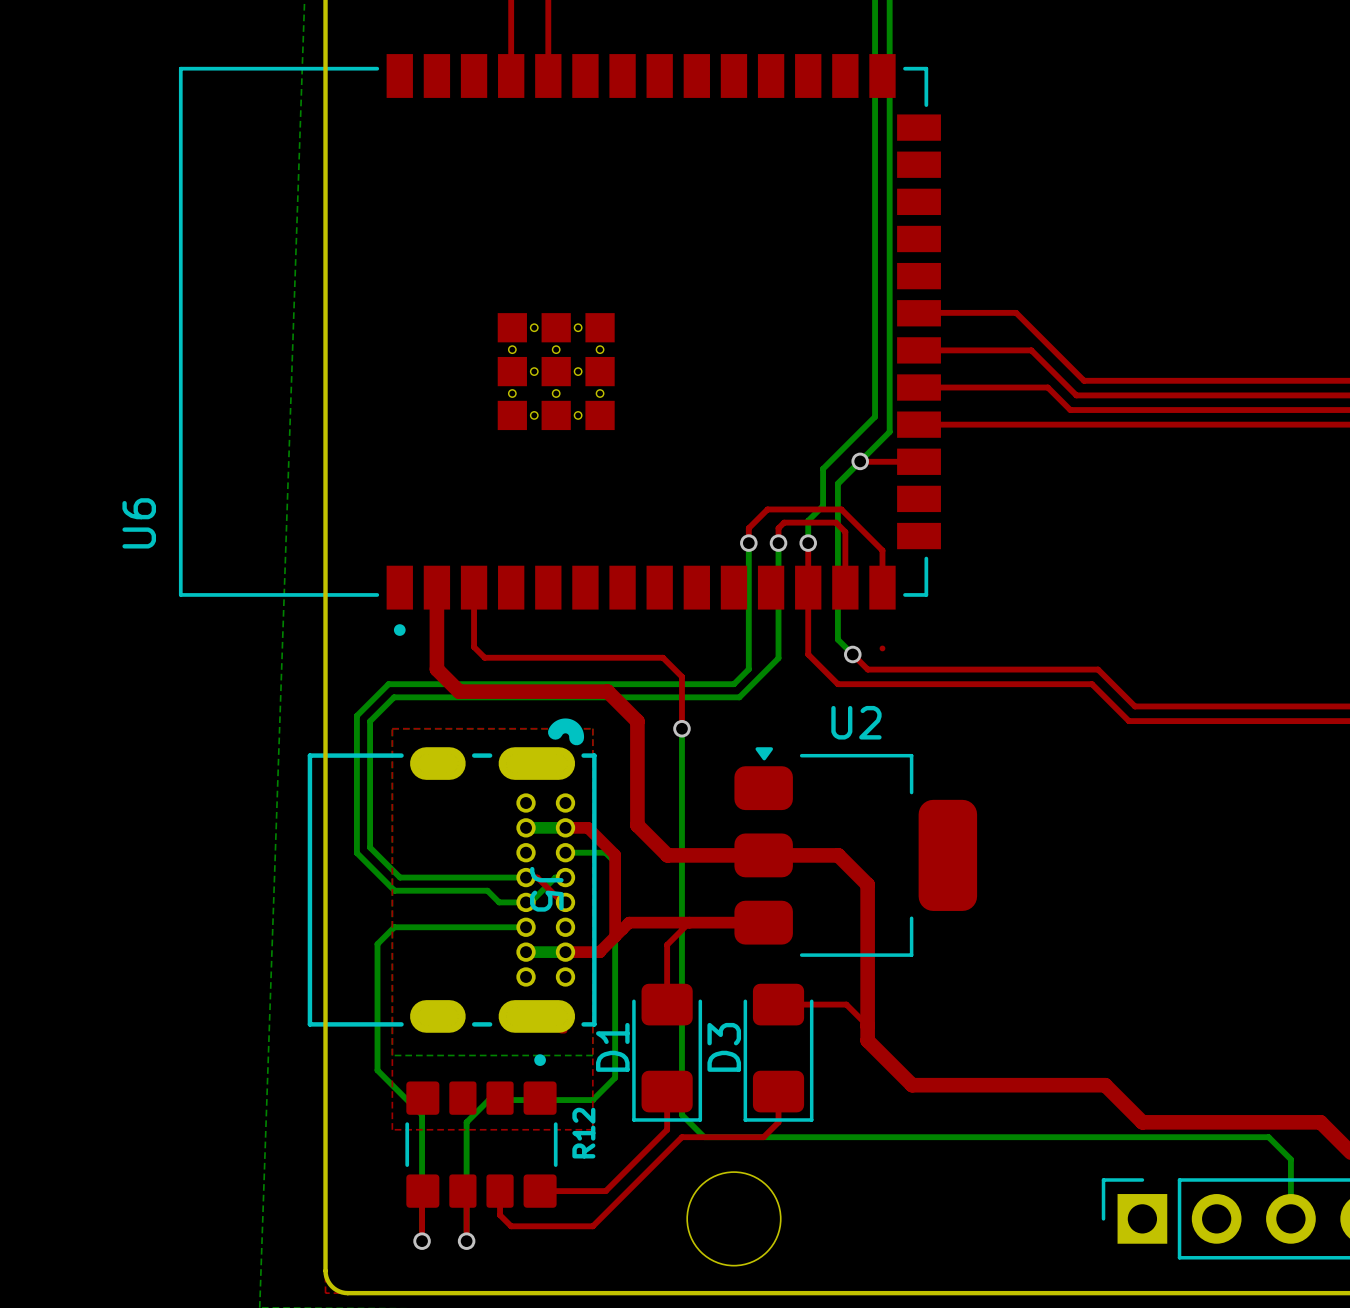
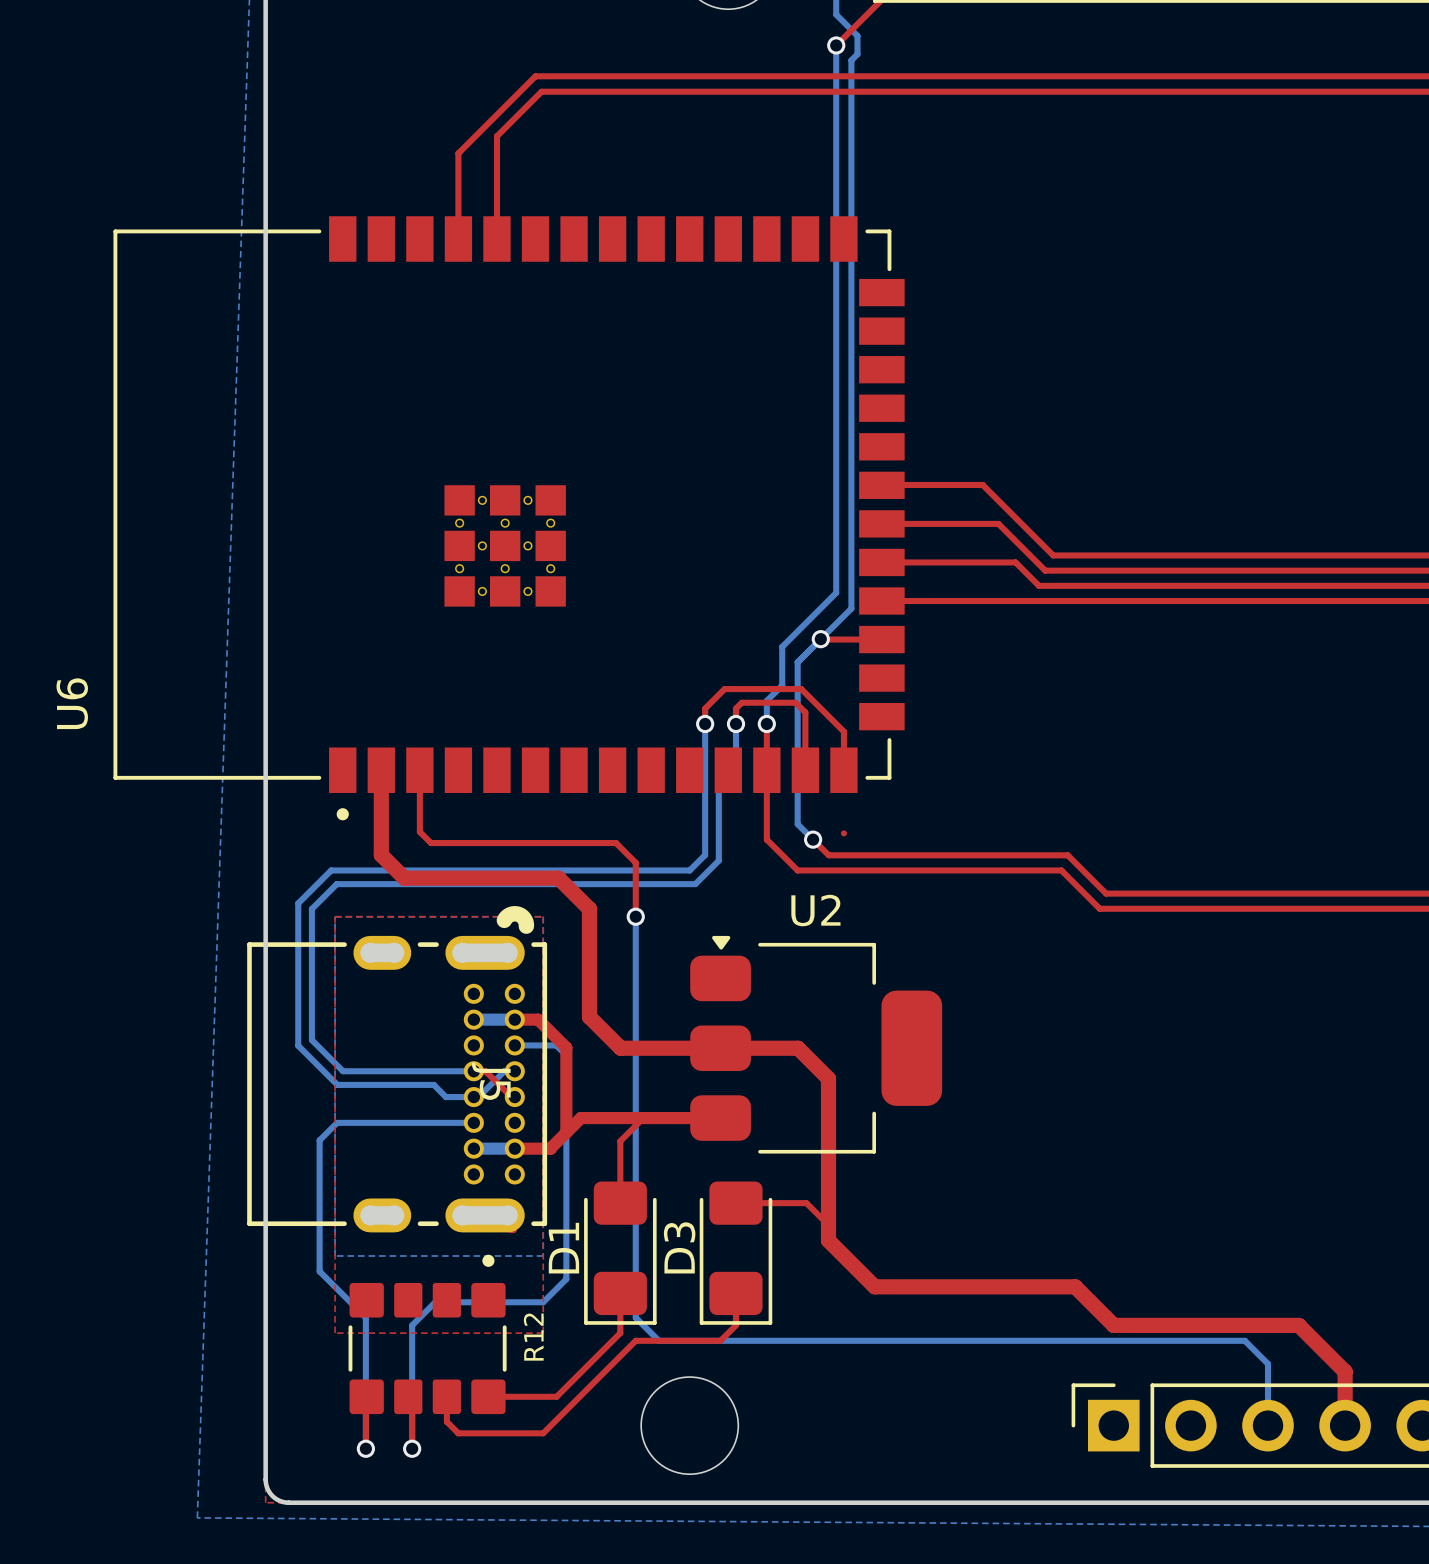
bottom track: (778, 576) (778, 658) (761, 674) -> (735, 758) (718, 775) (718, 860)

